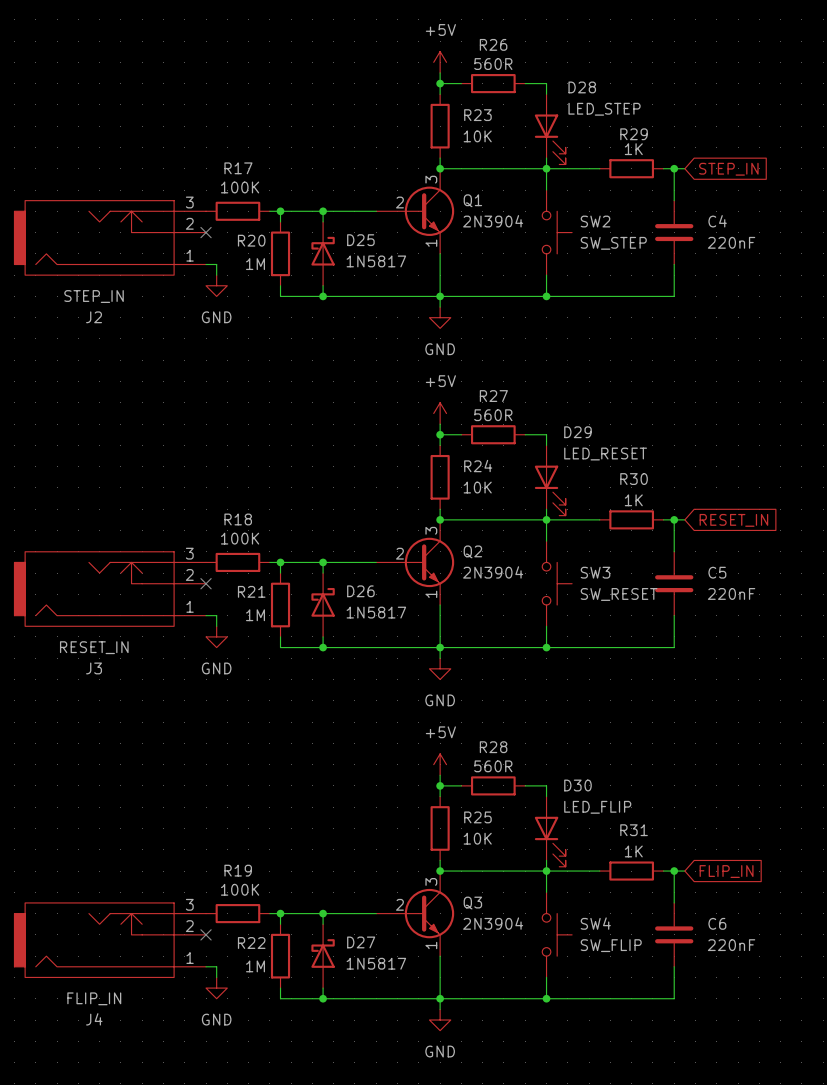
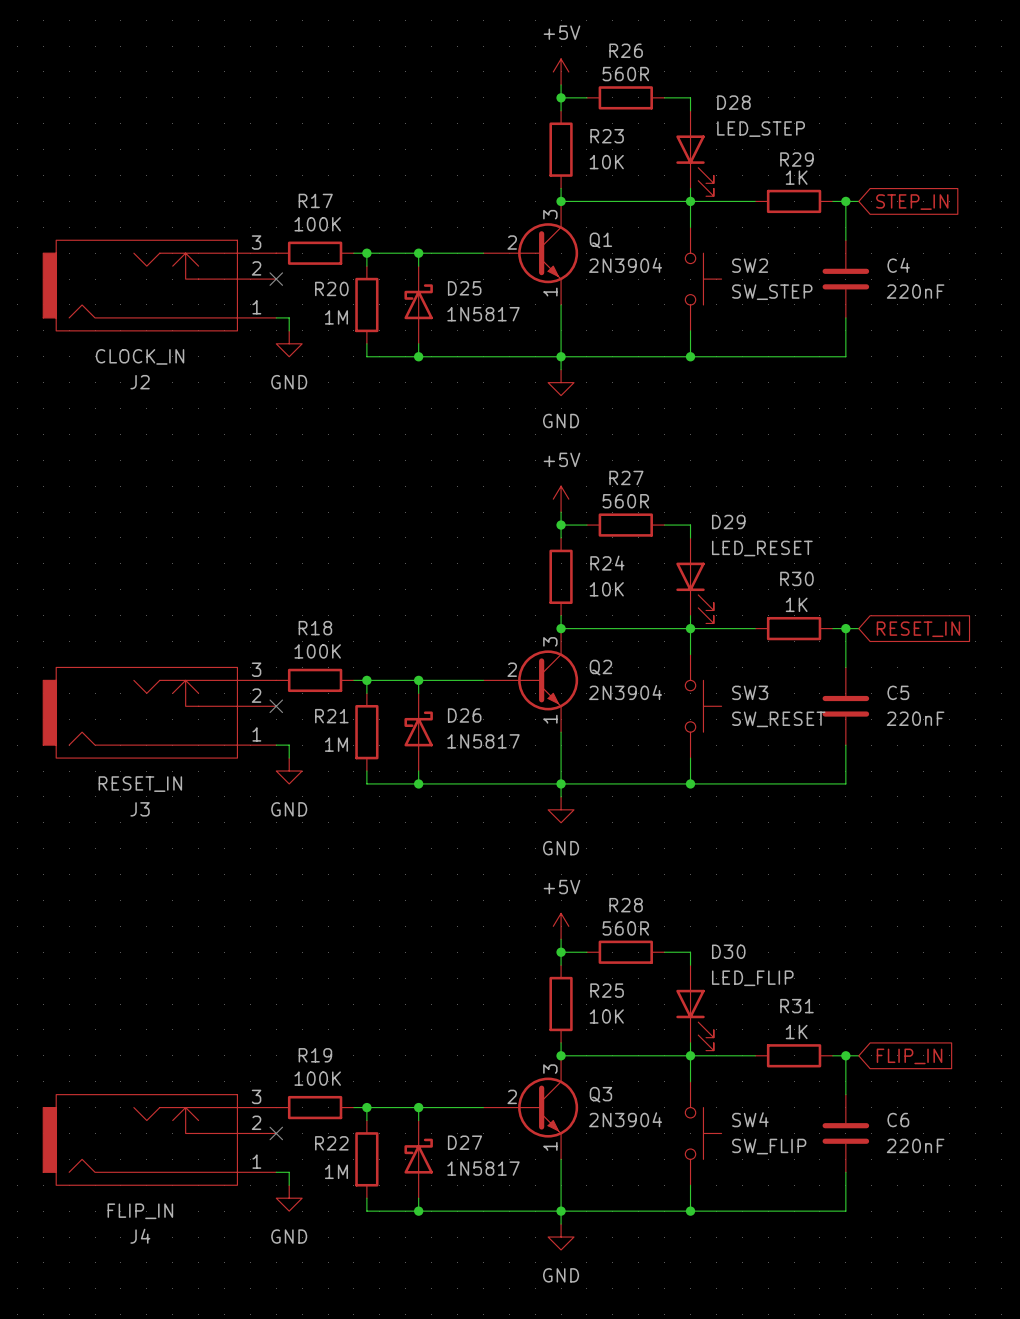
J2 value: STEP_IN (94, 296) -> CLOCK_IN (140, 356)

